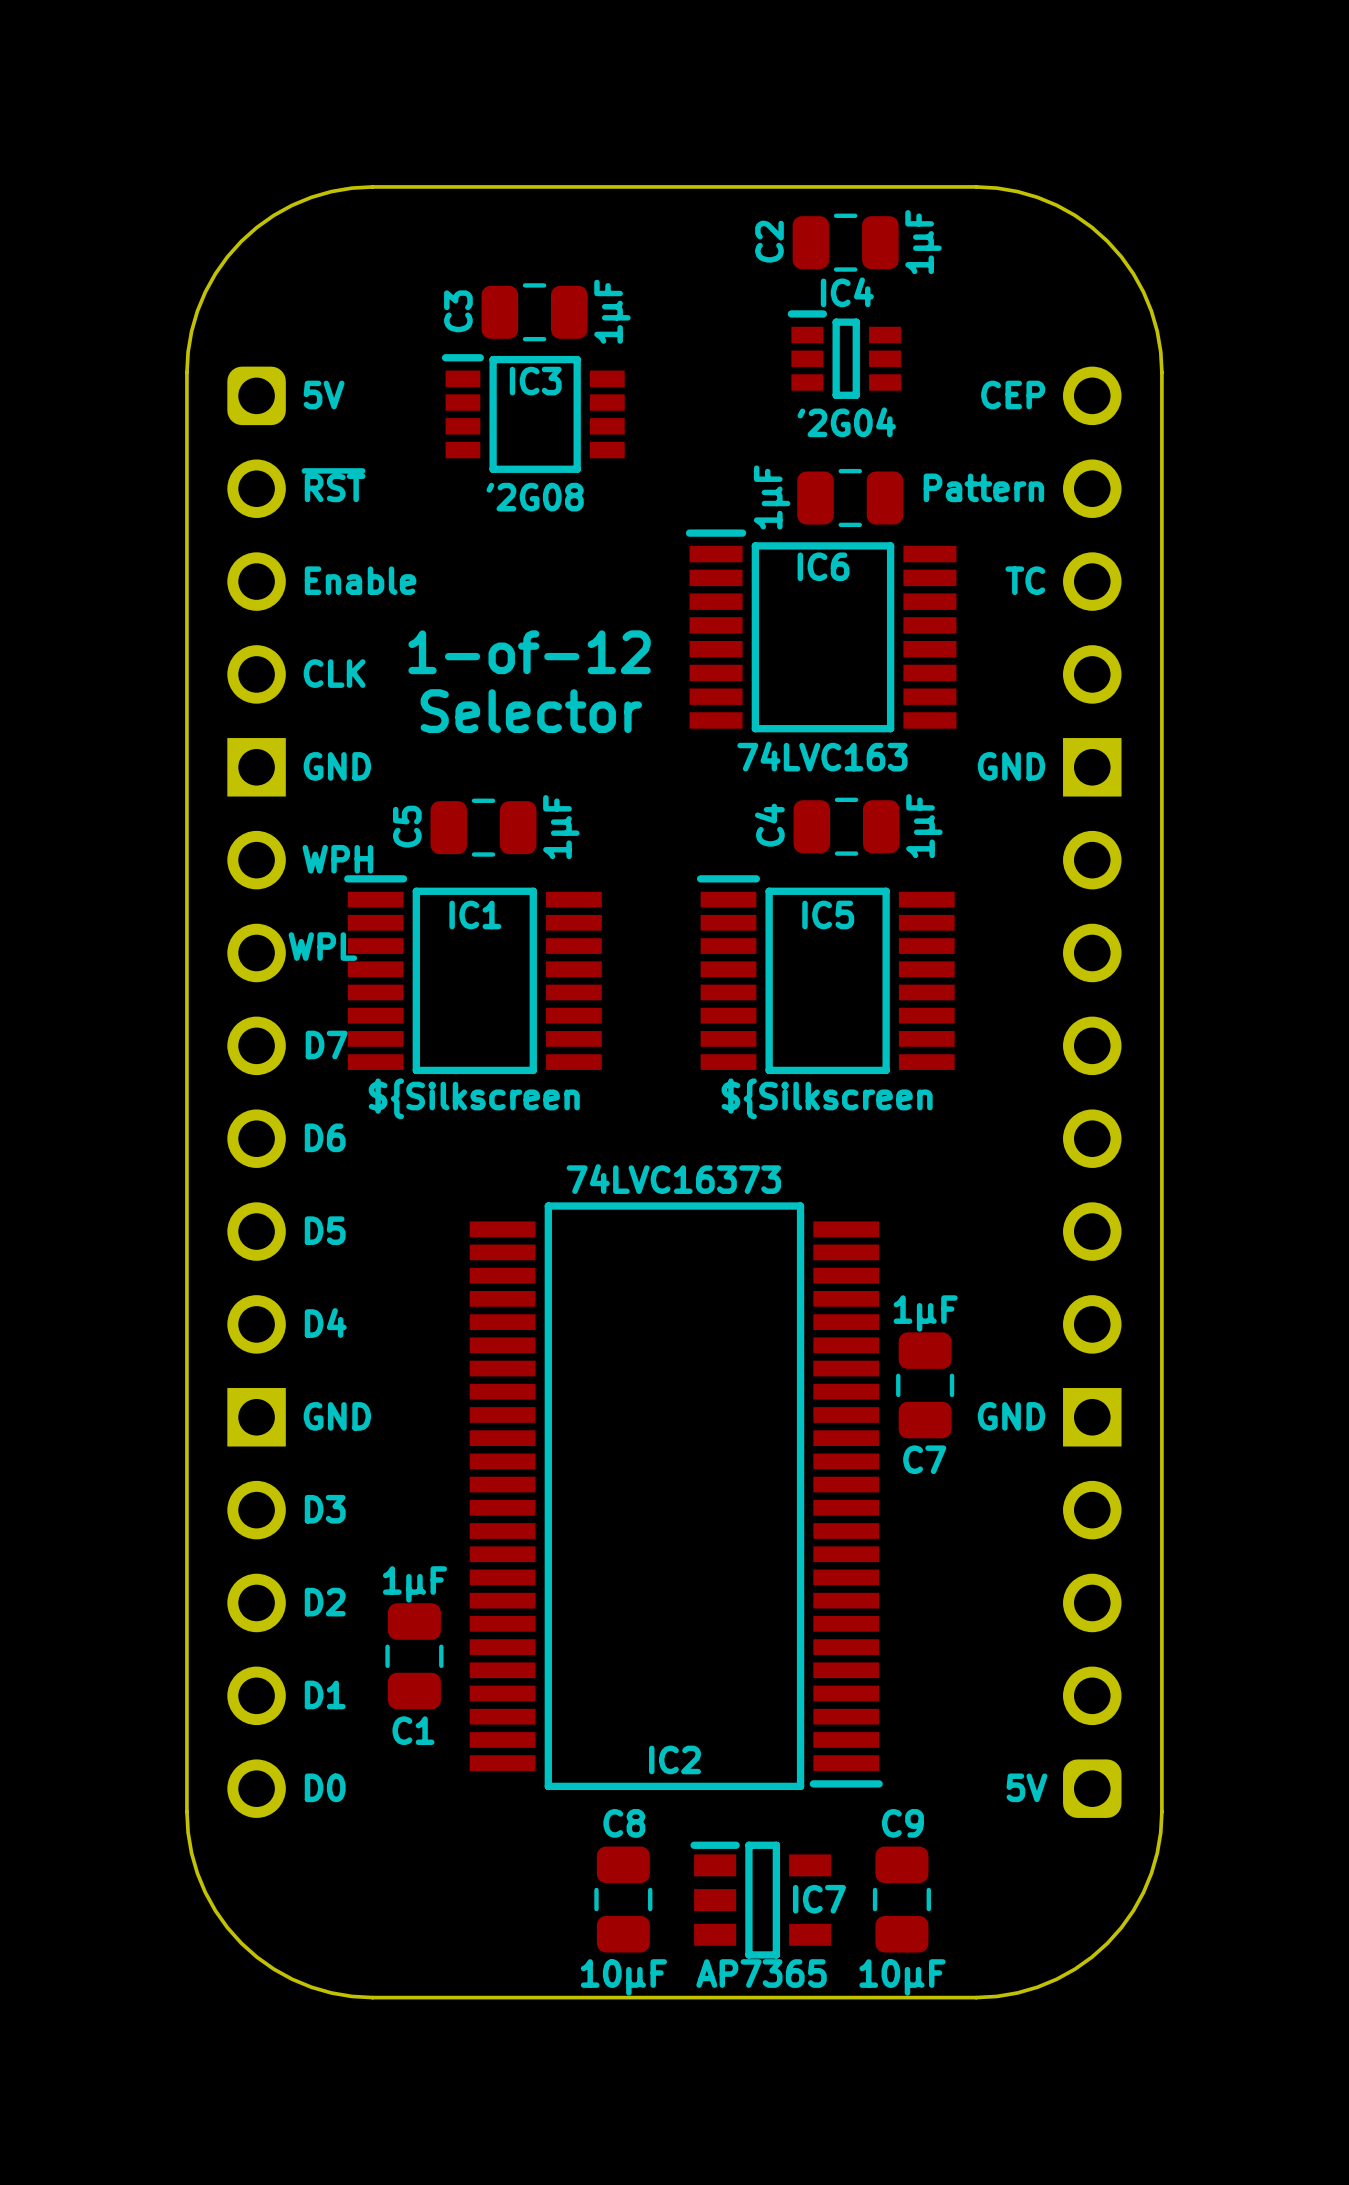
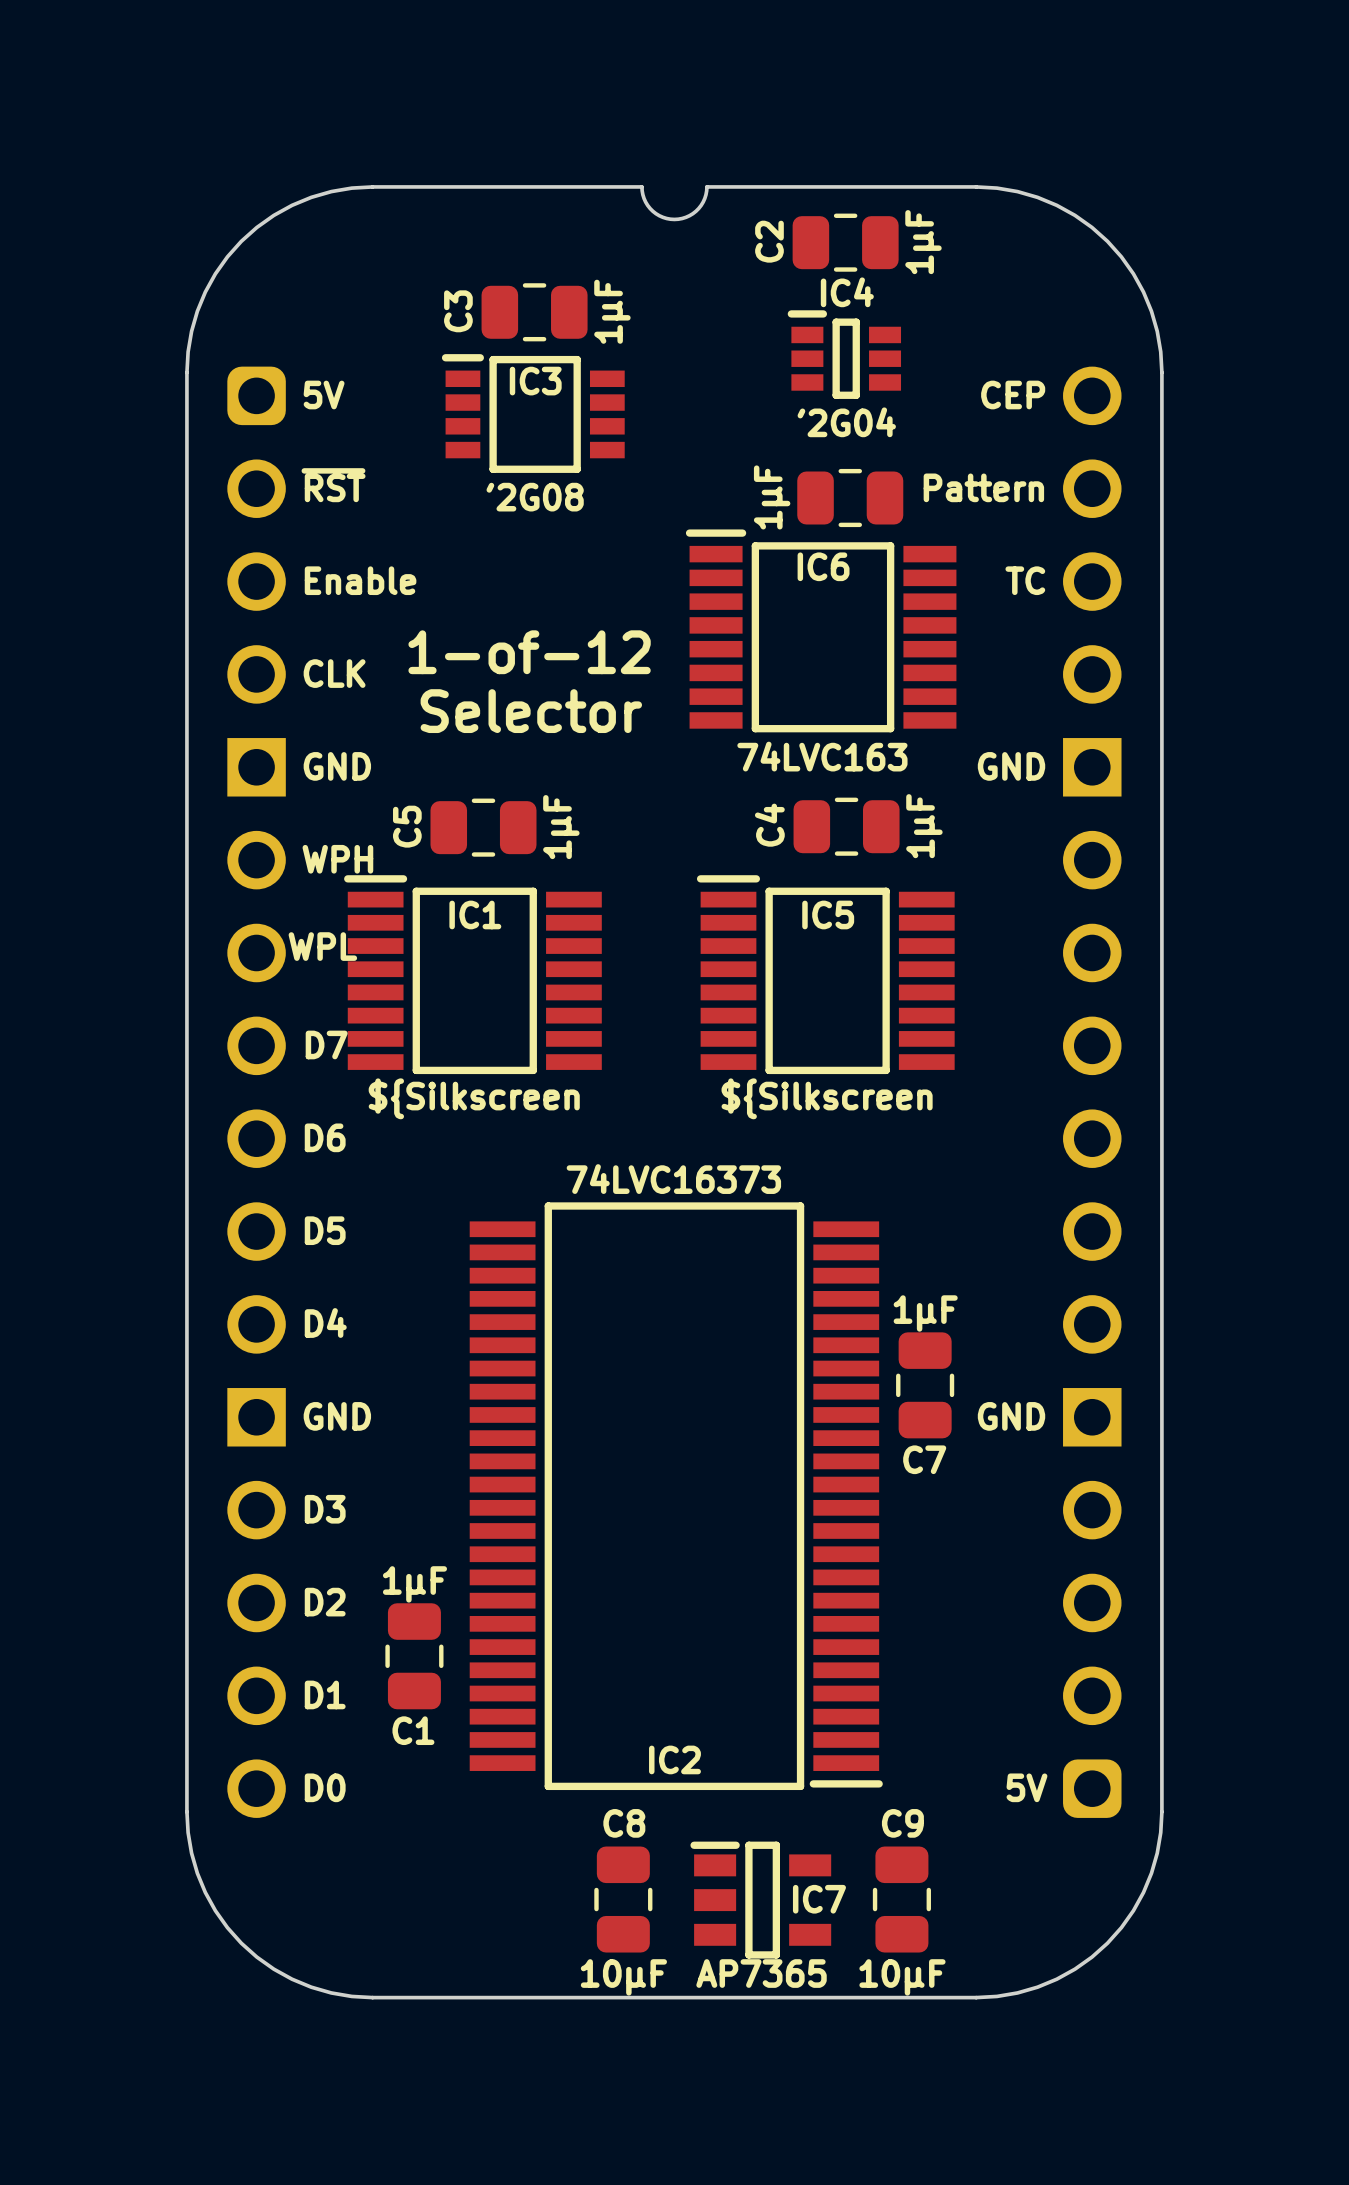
part footprint: [185, 185, 1164, 2000] -> [185, 185, 1164, 2000]

